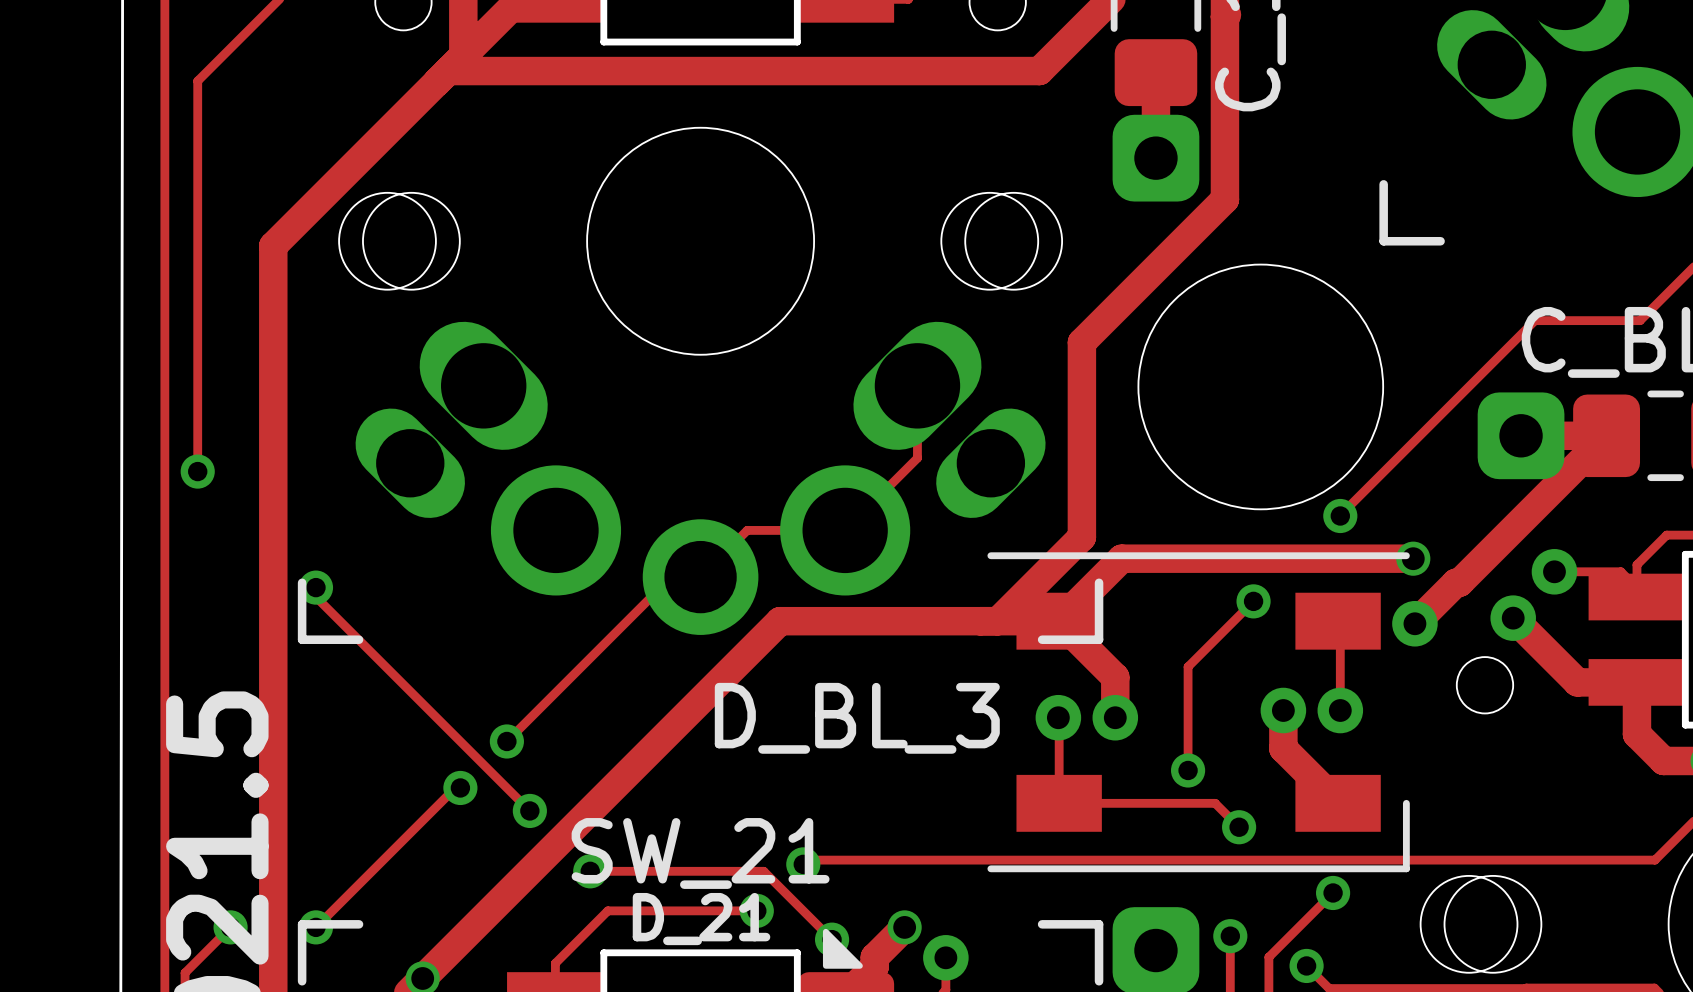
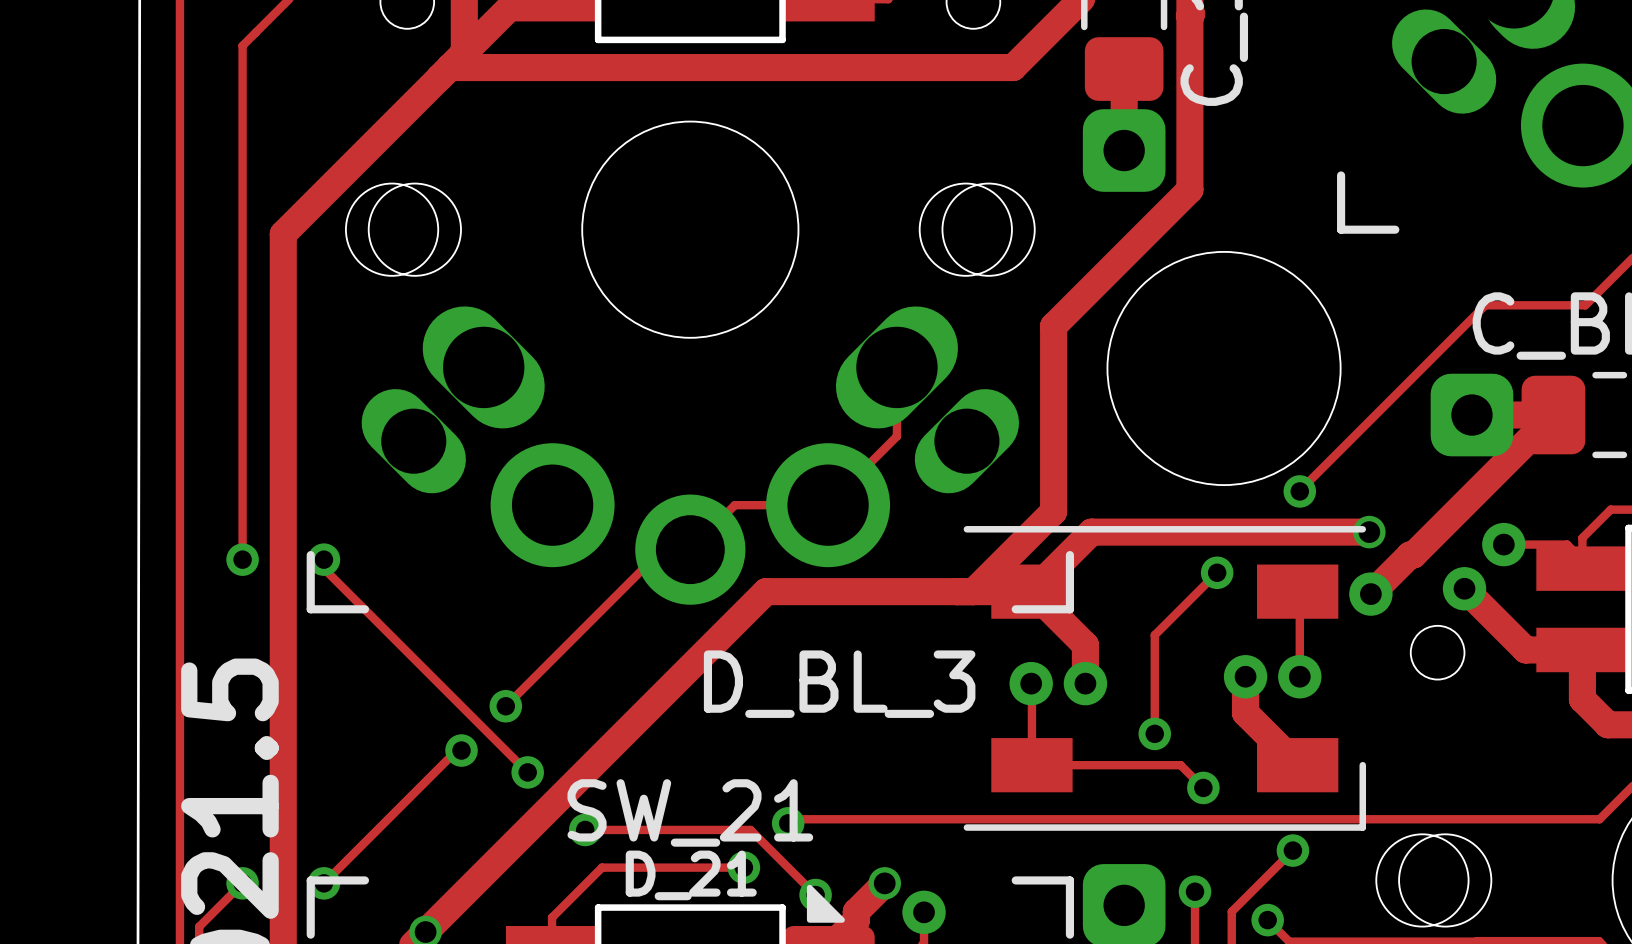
track: (230, 48) (197, 81) (197, 471) -> (242, 45) (242, 559)
via position: (197, 471) -> (242, 559)

